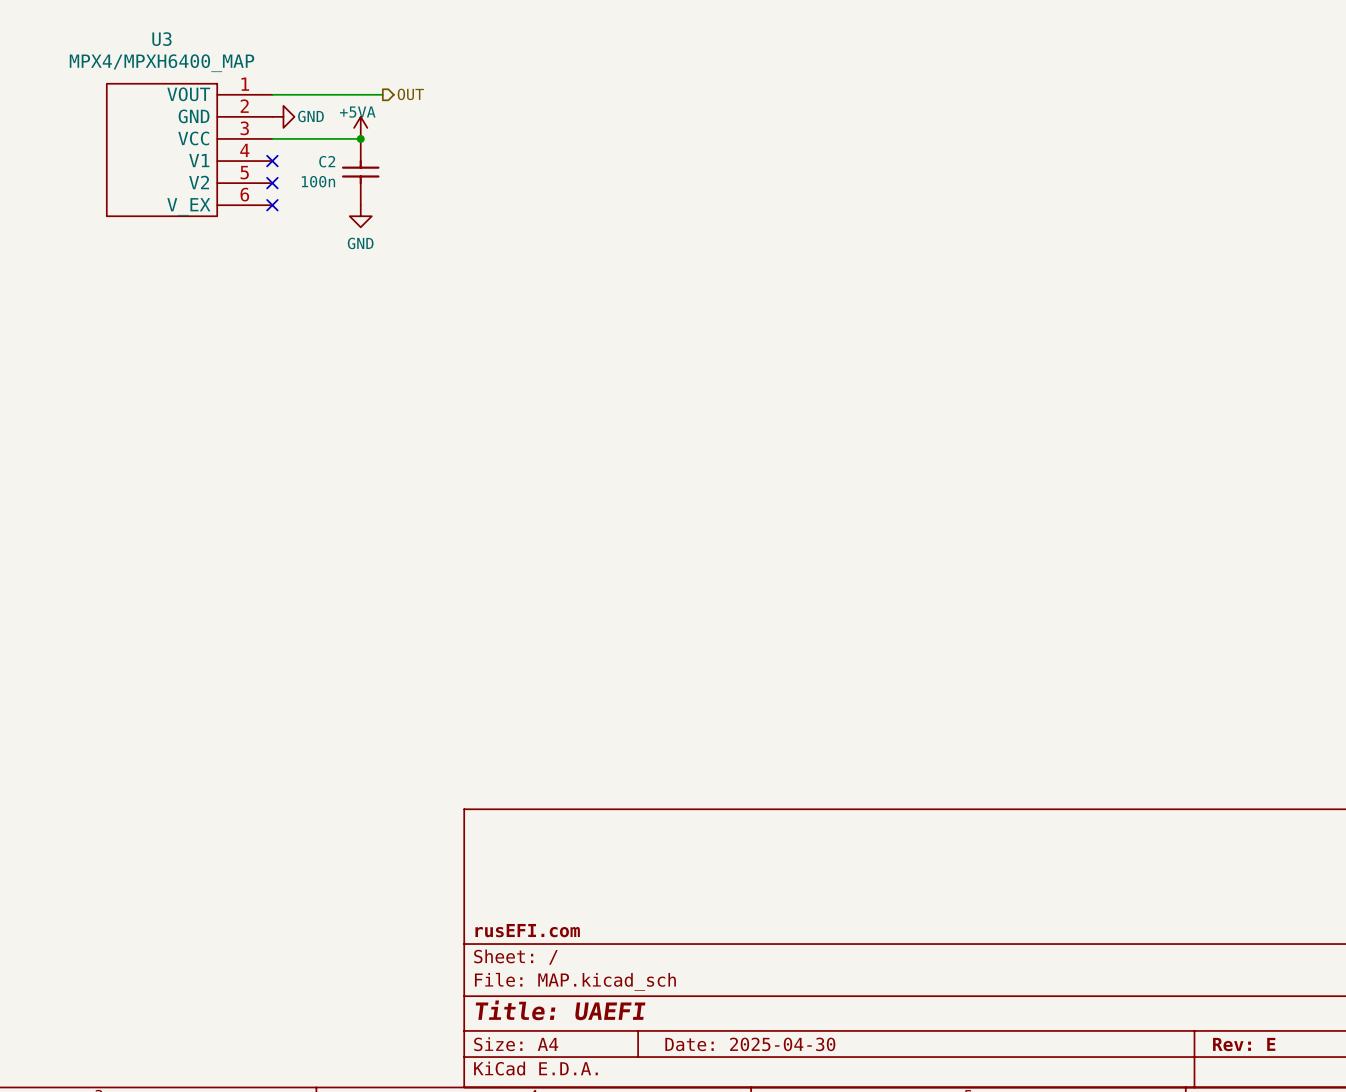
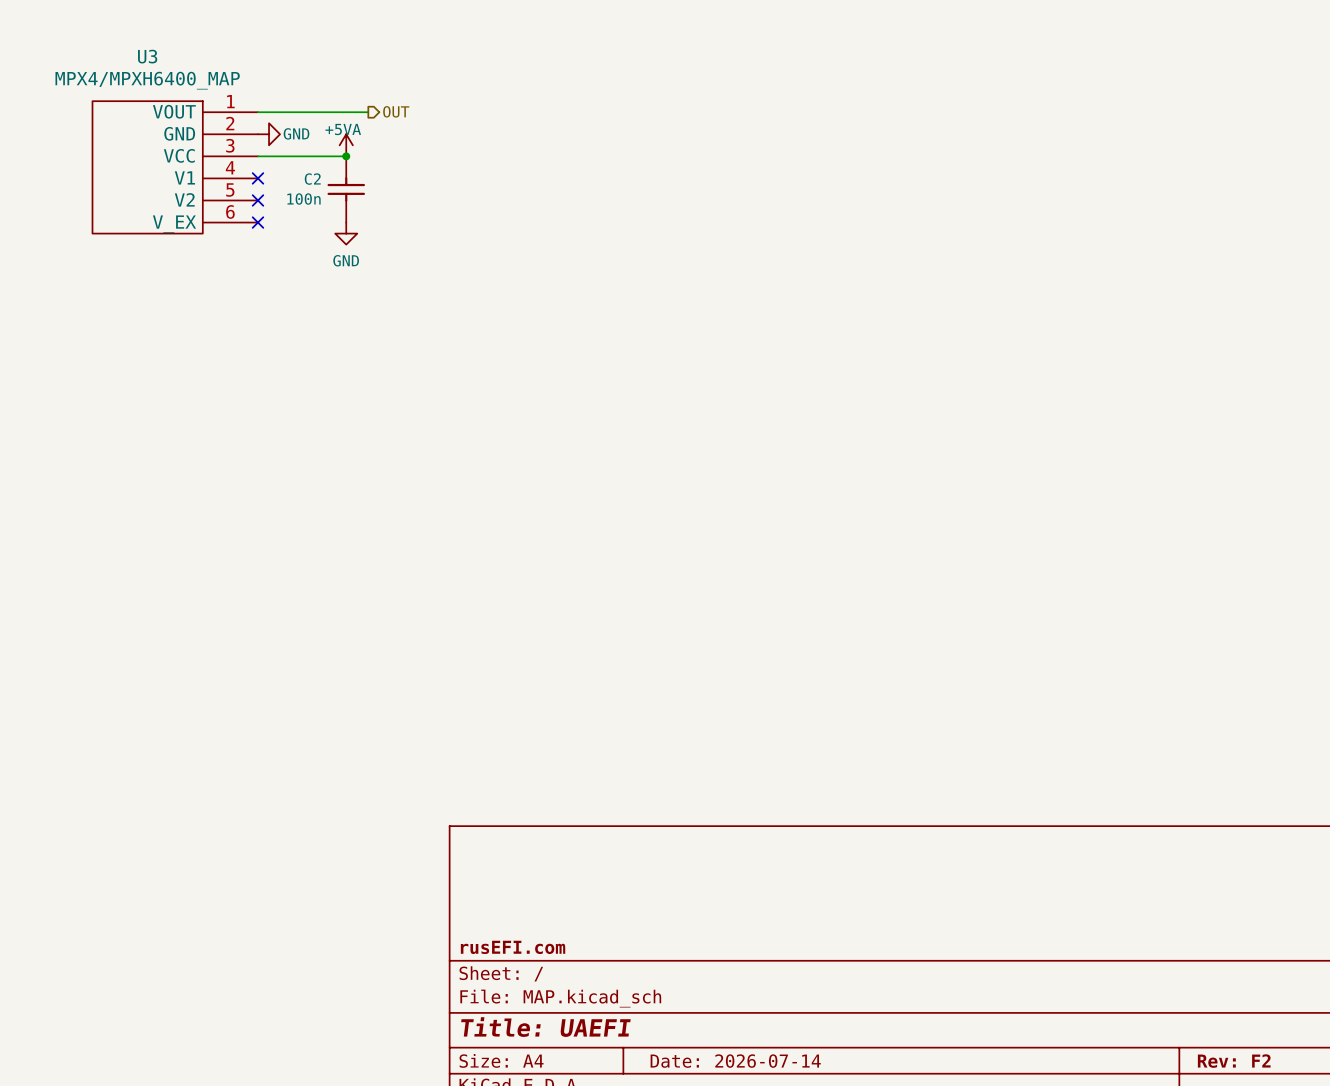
title block: Date: 2025-04-30 (750, 1044) -> Date: 2026-07-14 (735, 1061)
title block: Rev: E (1244, 1044) -> Rev: F2 (1234, 1061)

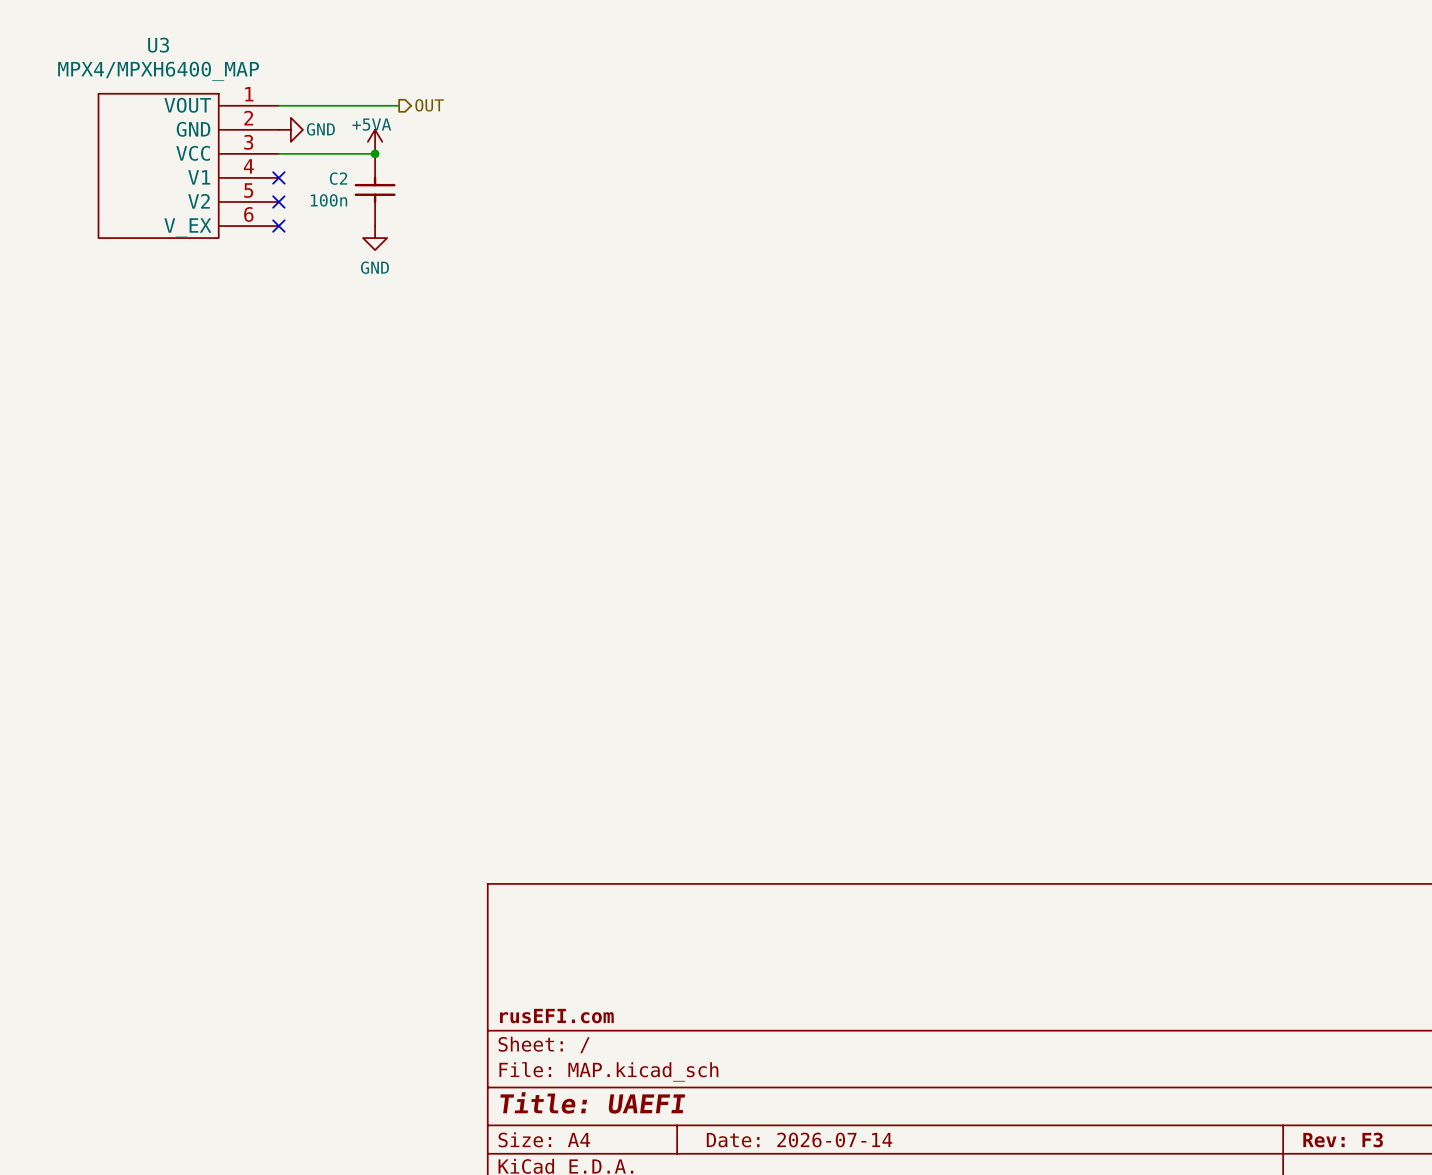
title block: Rev: F2 (1234, 1061) -> Rev: F3 (1343, 1140)

